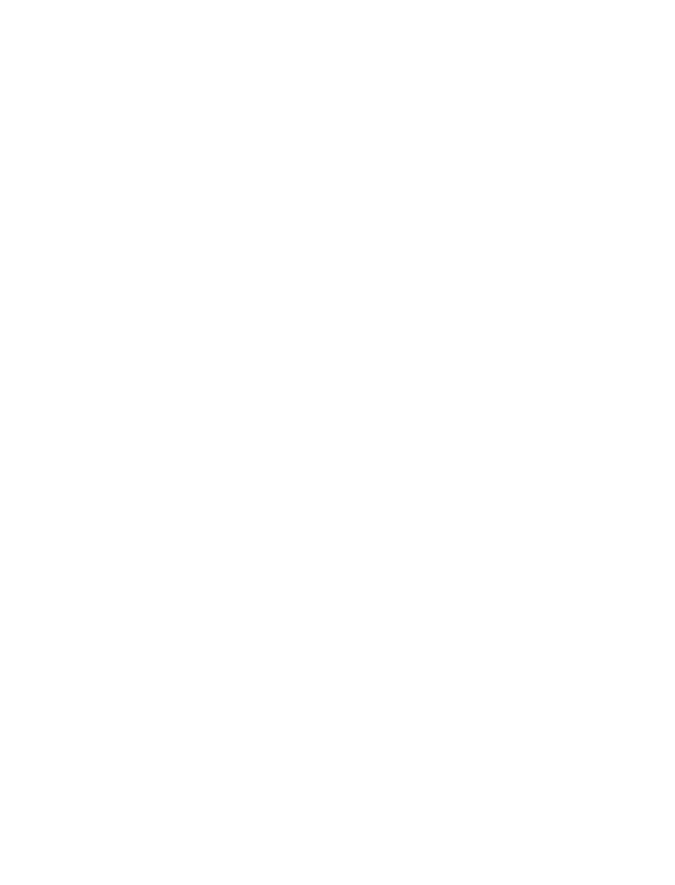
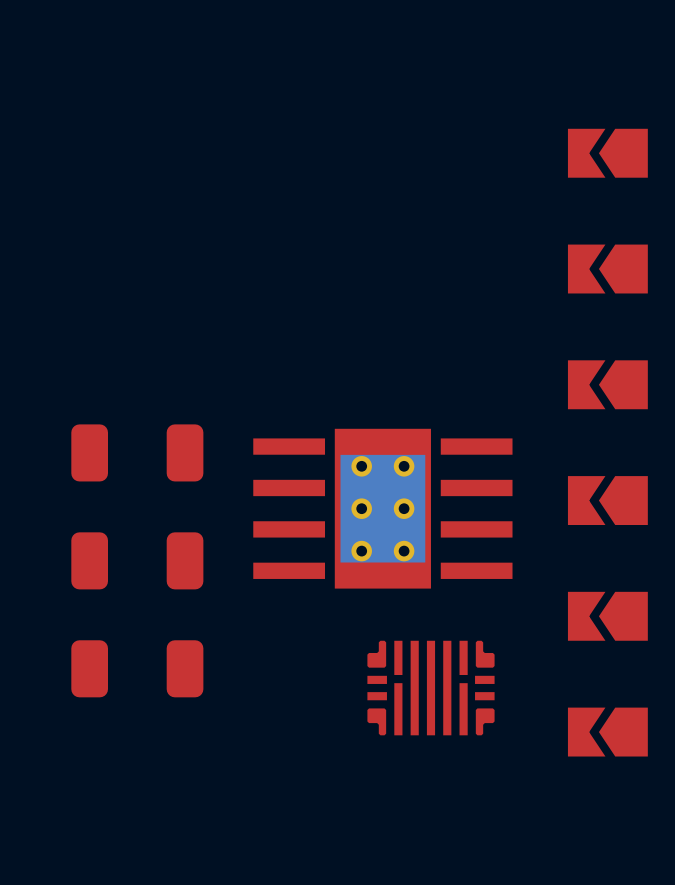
part: none -> (607, 153)
part: none -> (607, 269)
part: none -> (607, 384)
part: none -> (137, 452)
part: none -> (607, 500)
part: none -> (382, 508)
part: none -> (137, 560)
part: none -> (607, 616)
part: none -> (137, 668)
part: none -> (430, 688)
part: none -> (607, 732)

